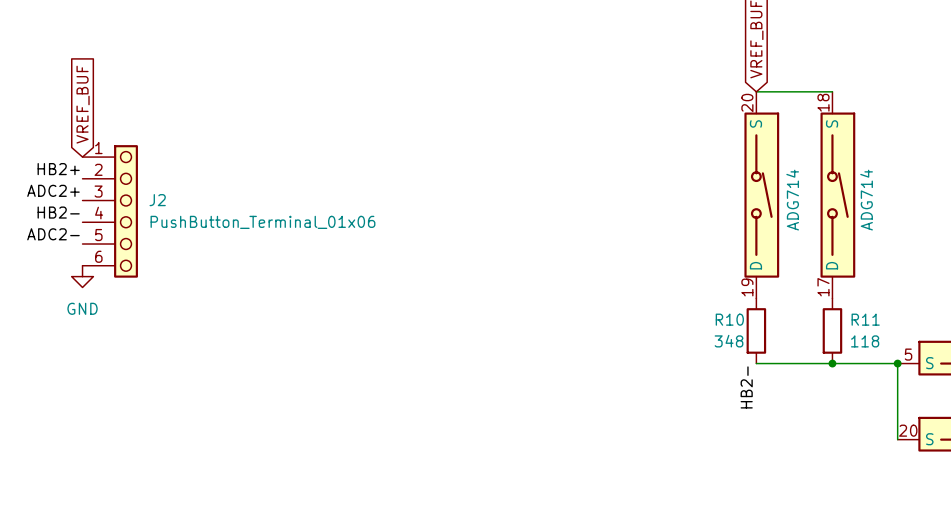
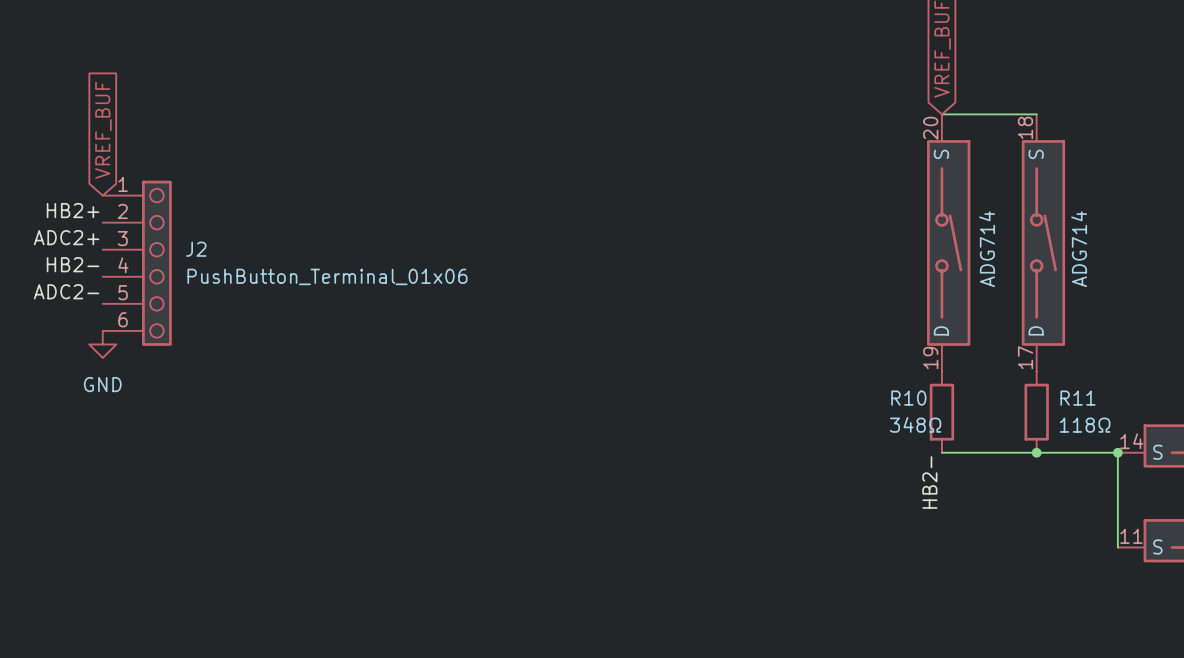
R10 value: 348 (729, 341) -> 348Ω (915, 424)
R11 value: 118 (865, 341) -> 118Ω (1085, 425)
part pin number: 5 (908, 354) -> 14 (1131, 441)
part pin number: 20 (908, 430) -> 11 (1131, 536)

